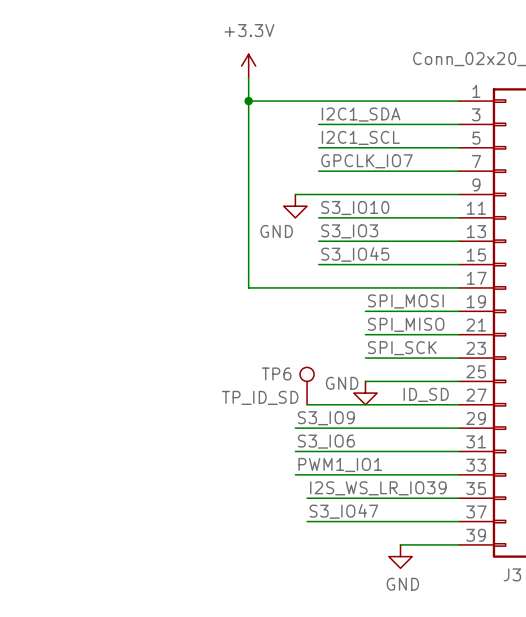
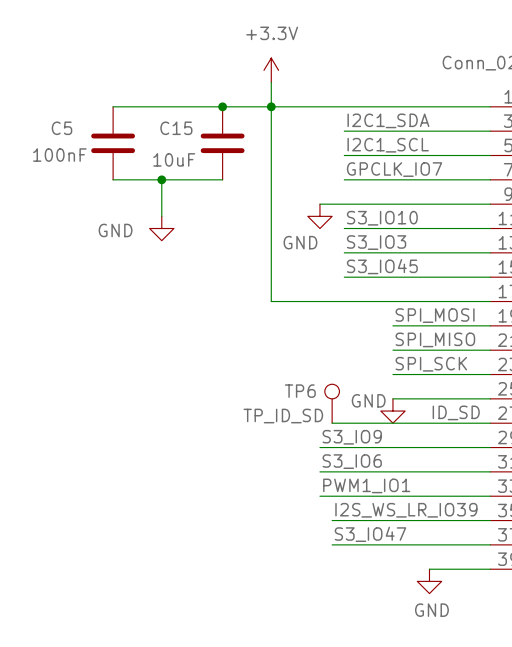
wire: none -> (113, 106) (271, 106)
junction: none -> (222, 106)
C5: none -> 100nF (113, 143)
C15: none -> 10uF (222, 143)
wire: none -> (113, 179) (222, 179)
wire: none -> (161, 179) (161, 216)
junction: none -> (161, 179)
power symbol: none -> GND (161, 228)

